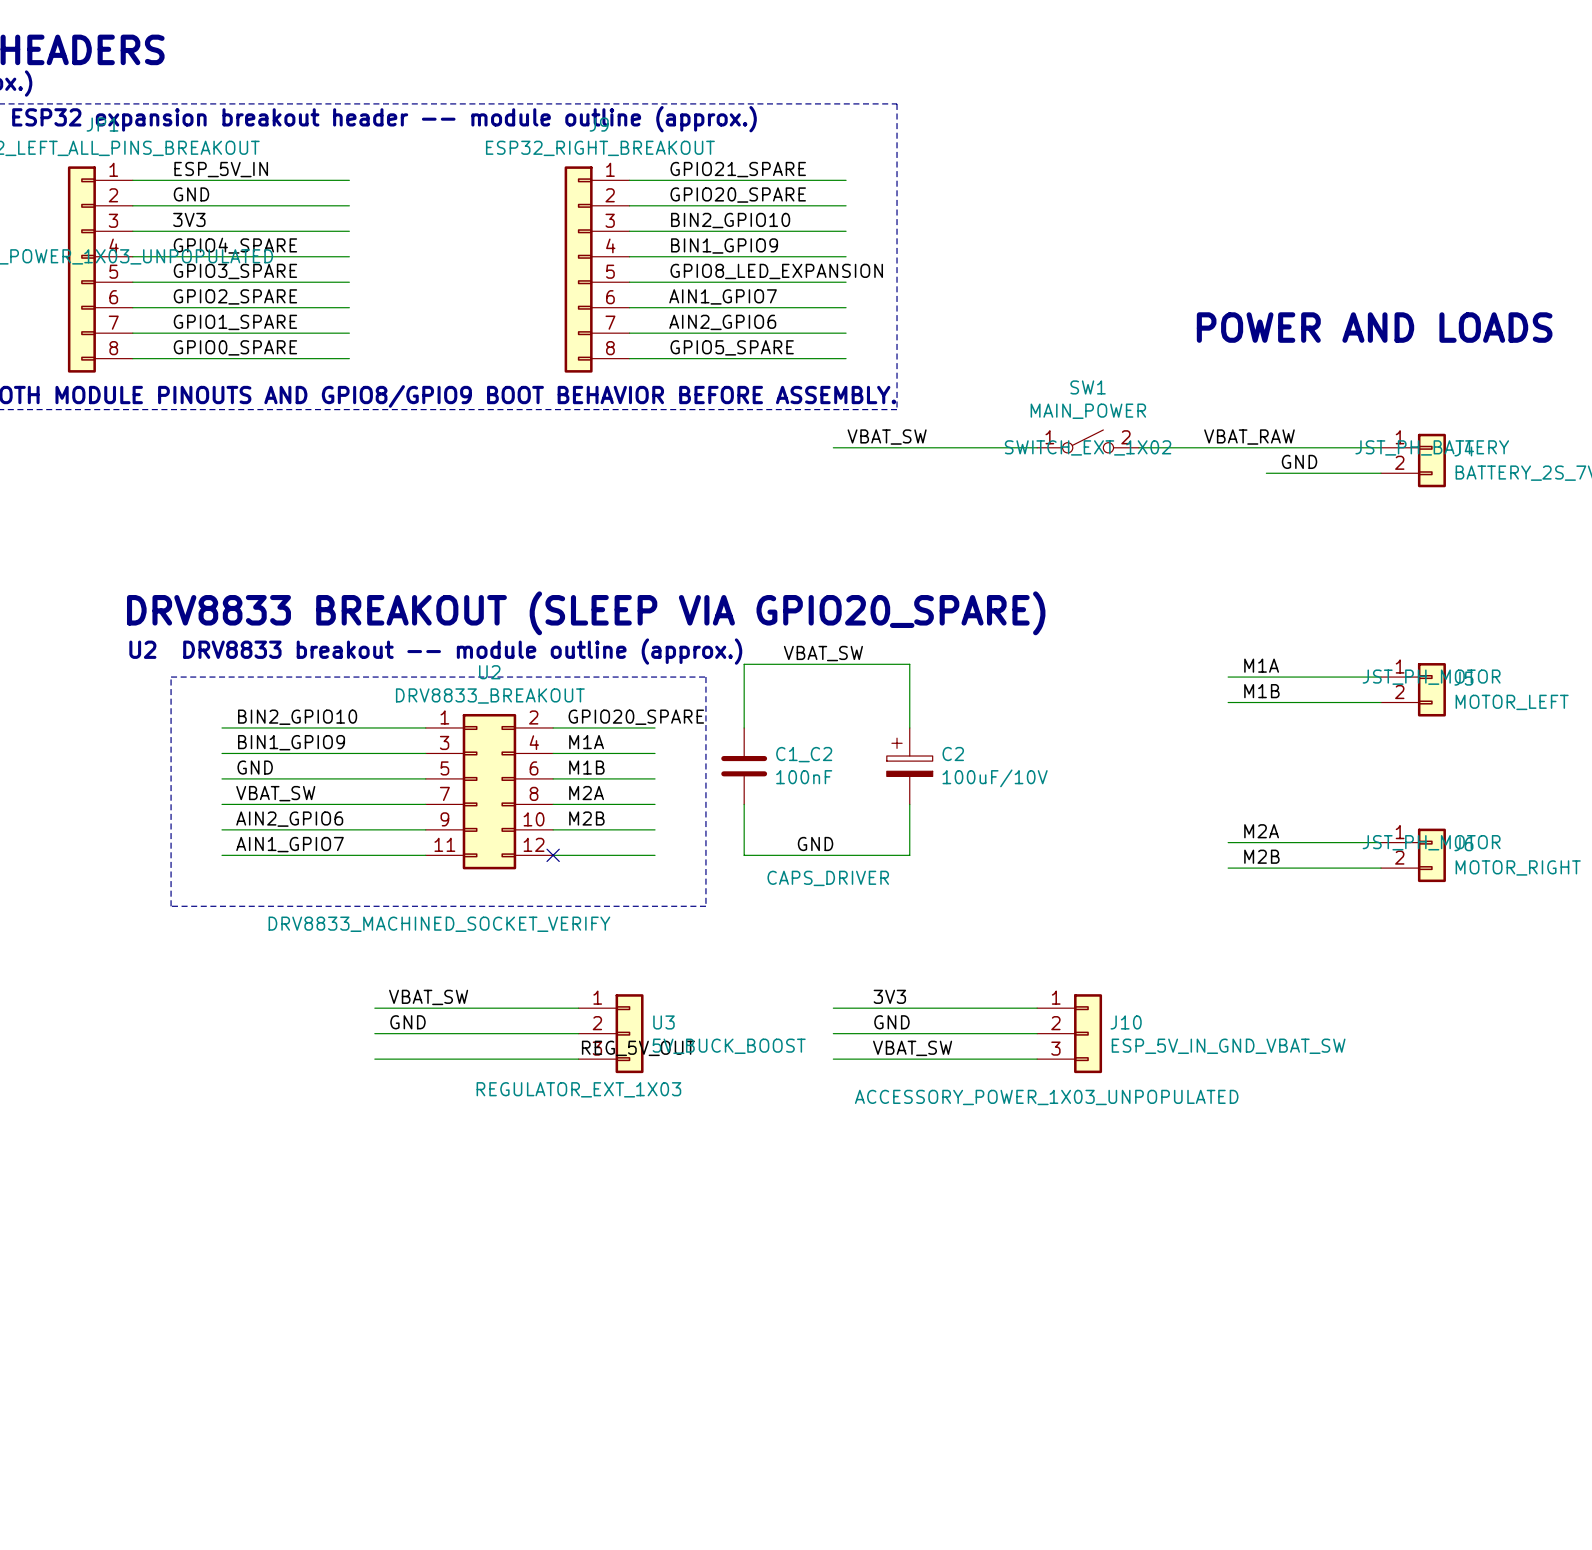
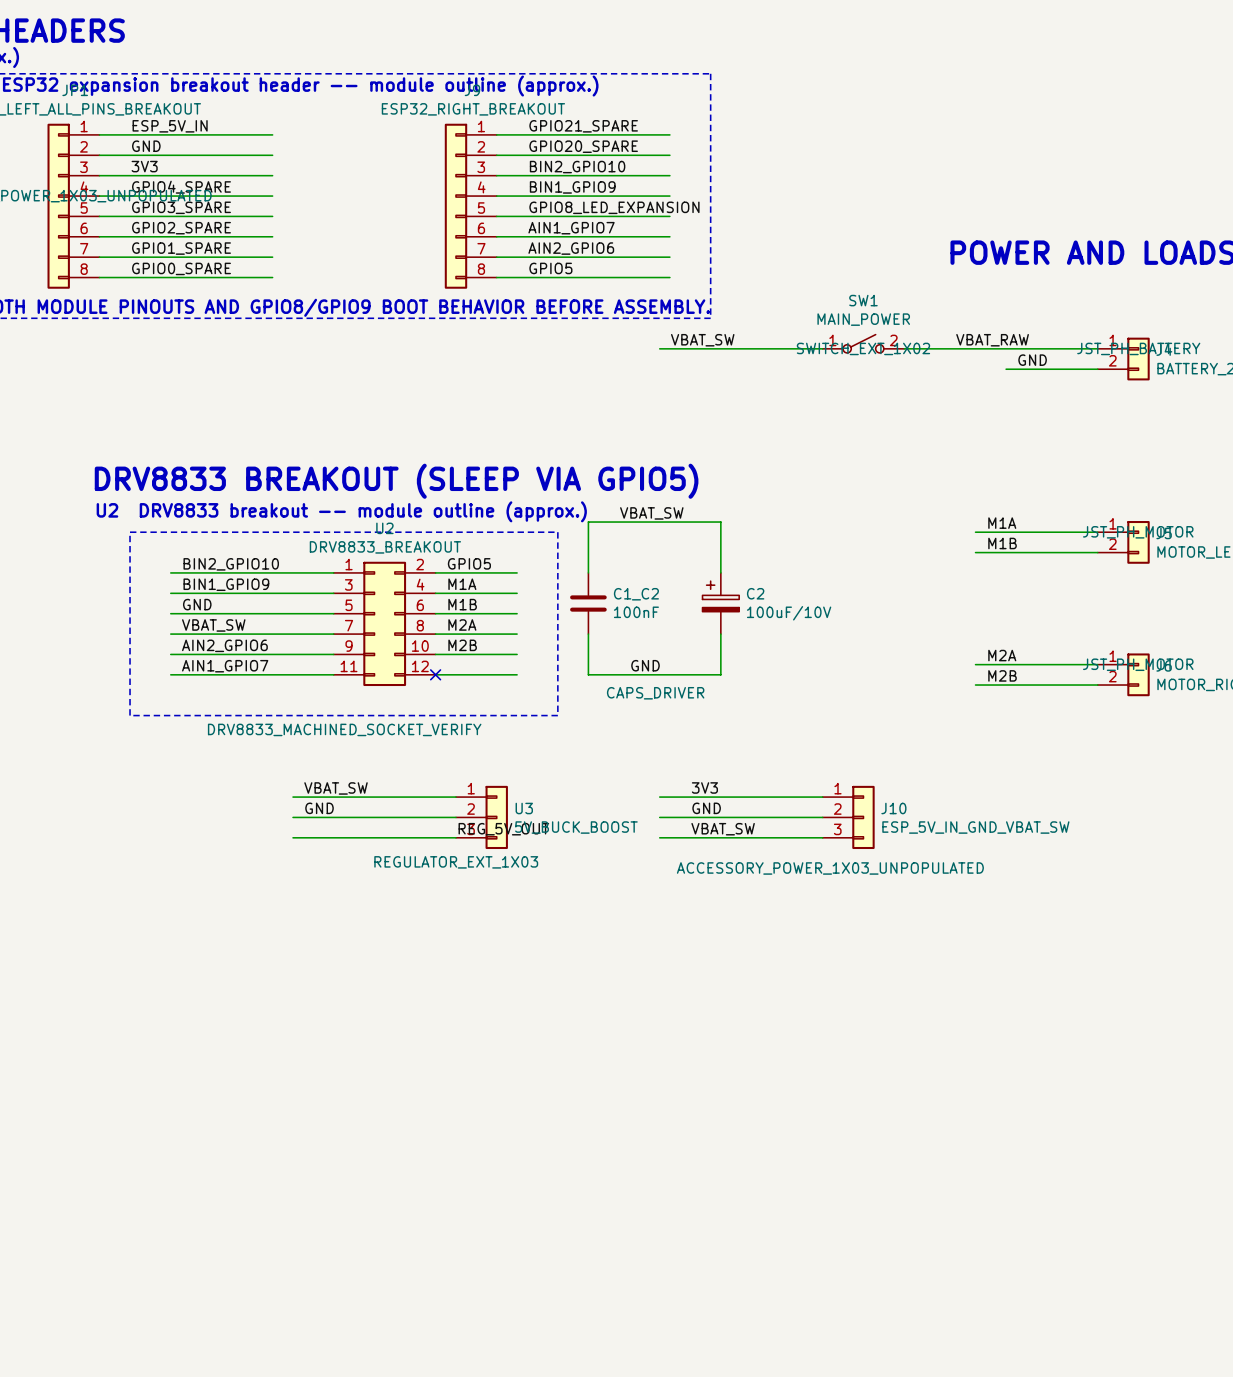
label: GPIO5_SPARE (732, 347) -> GPIO5 (550, 268)
text: DRV8833 BREAKOUT (SLEEP VIA GPIO20_SPARE) (586, 613) -> DRV8833 BREAKOUT (SLEEP VIA GPIO5) (396, 481)
label: GPIO20_SPARE (636, 717) -> GPIO5 (469, 563)

